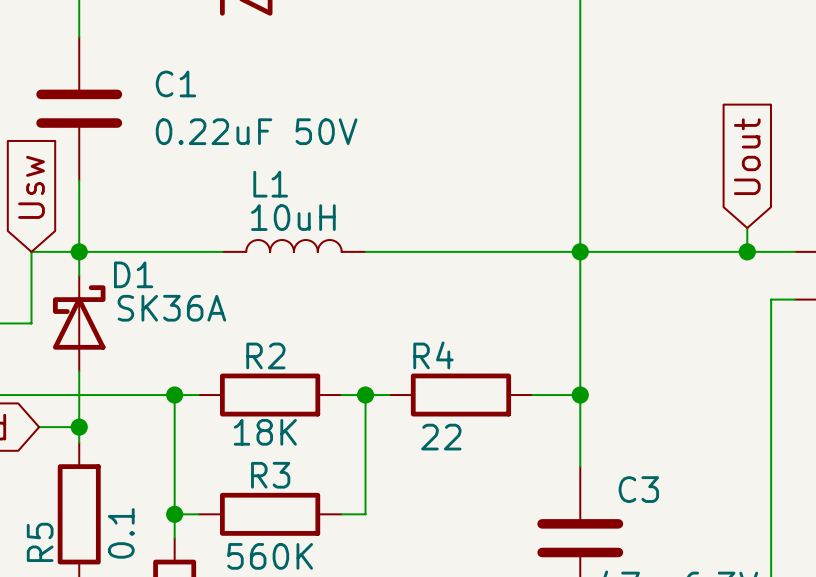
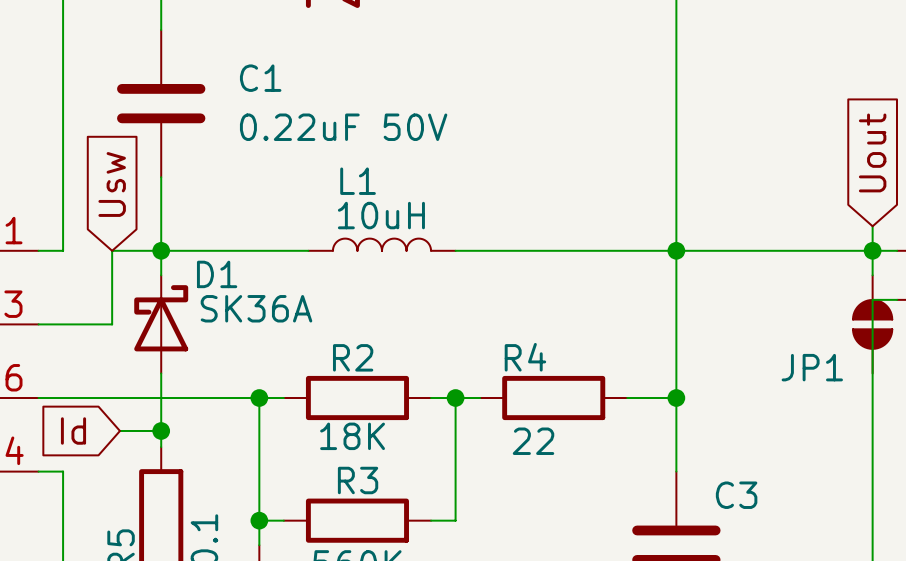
global label position: Uout (747, 156) -> Uout (872, 152)
wire: (747, 228) (747, 251) -> none
wire: none -> (872, 226) (872, 275)
junction position: (747, 251) -> (872, 250)
JP1: none -> (872, 324)

